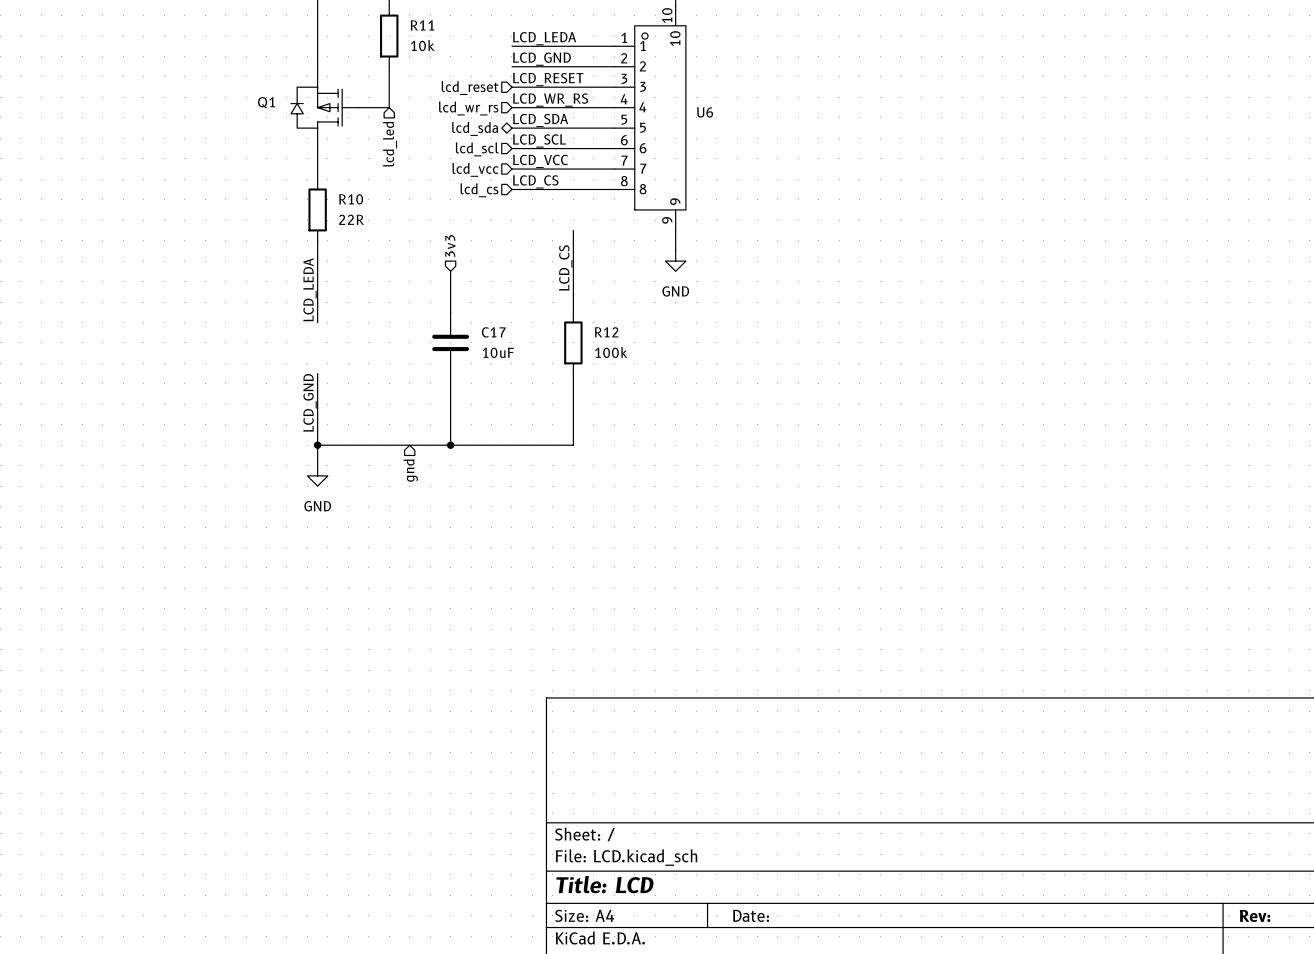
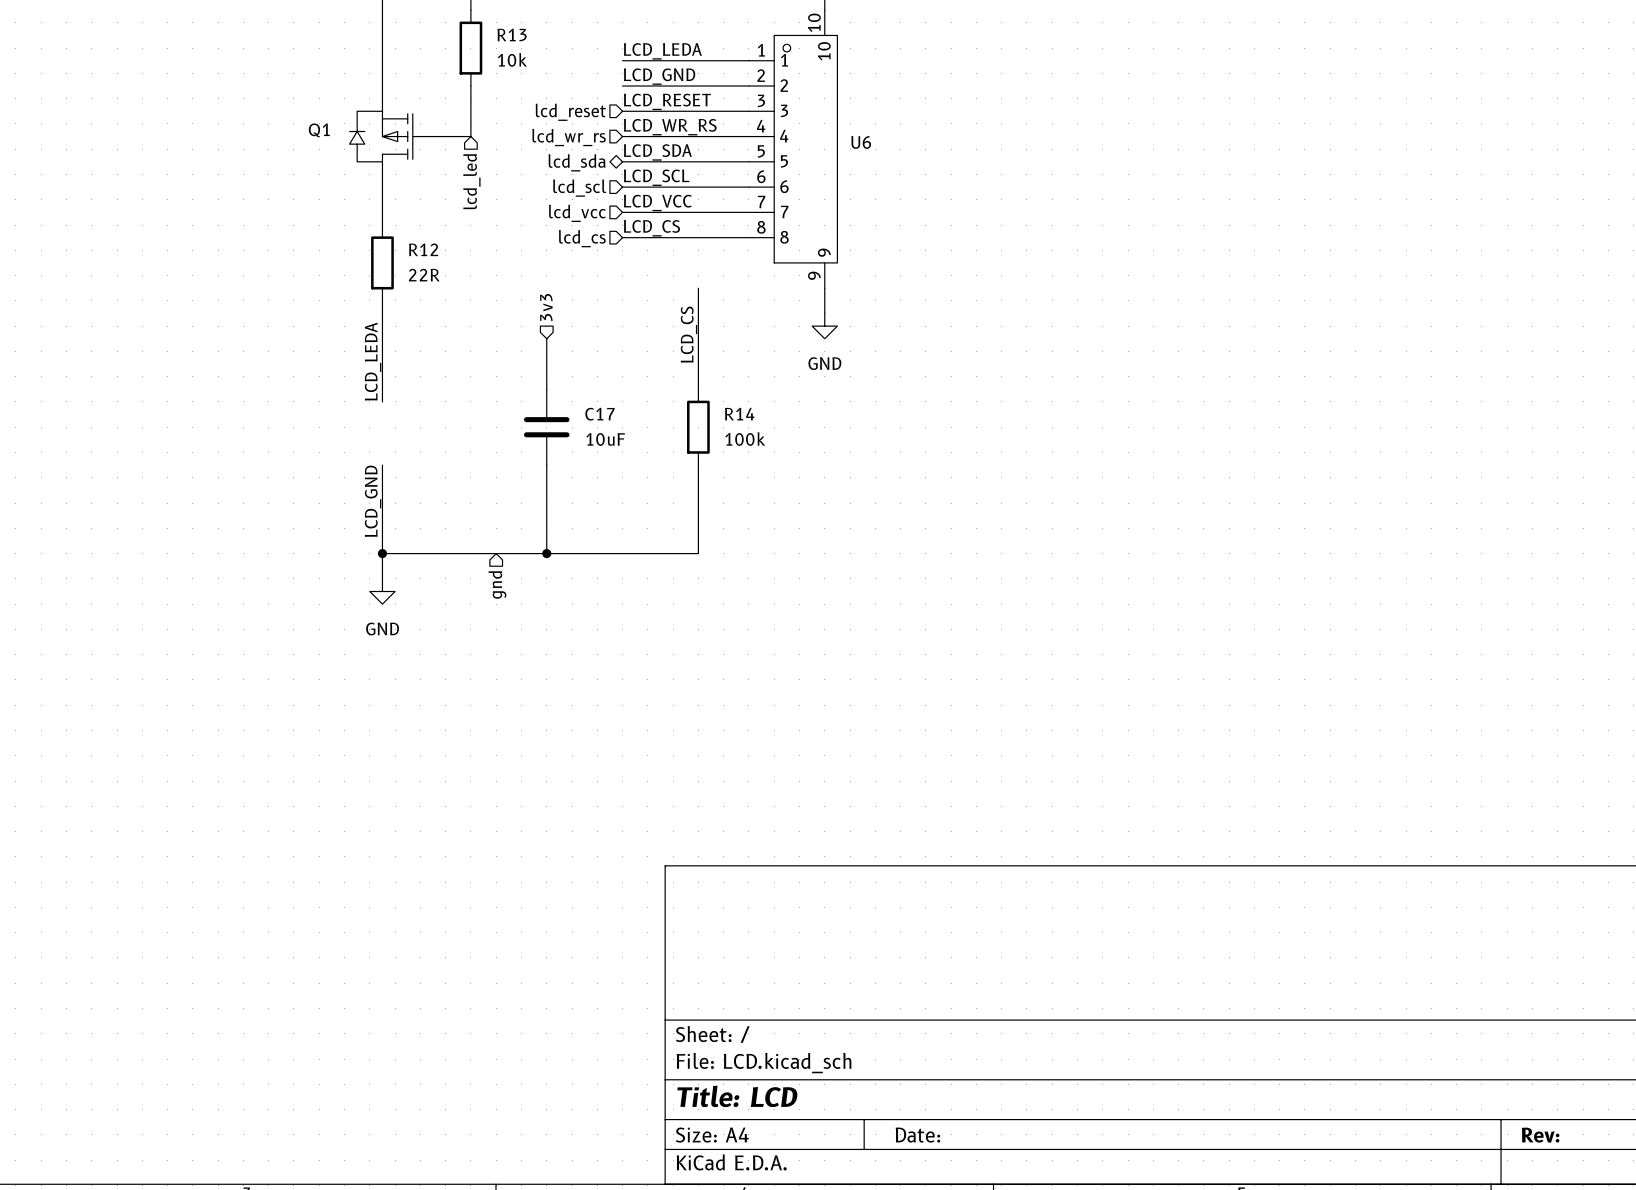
R11 name: R11 (422, 25) -> R13 (512, 34)
R10 name: R10 (351, 199) -> R12 (423, 249)
R12 name: R12 (606, 332) -> R14 (739, 414)

